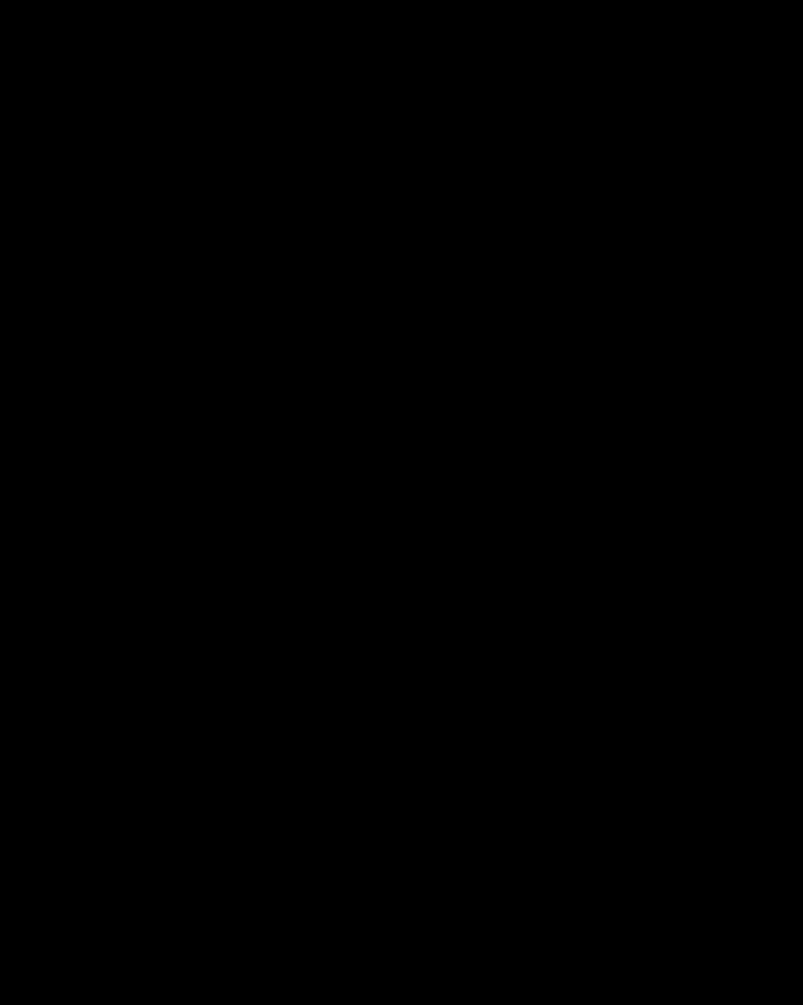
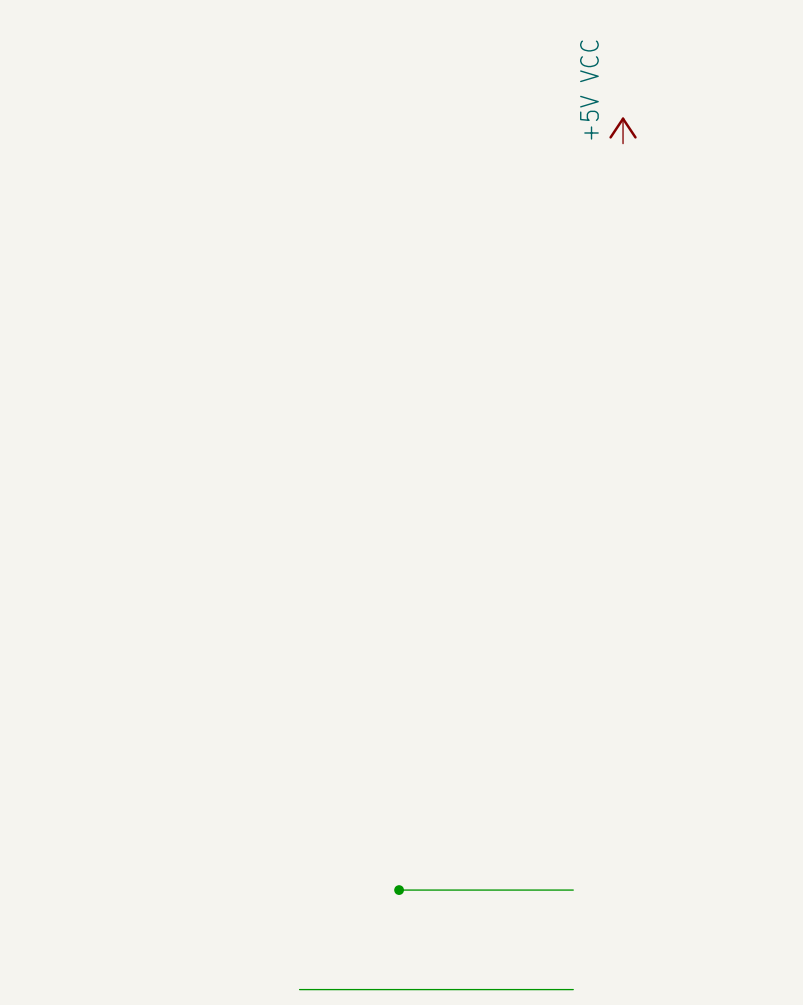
power symbol: none -> +5V VCC (623, 130)
wire: none -> (399, 890) (573, 890)
junction: none -> (399, 890)
wire: none -> (299, 989) (573, 989)

